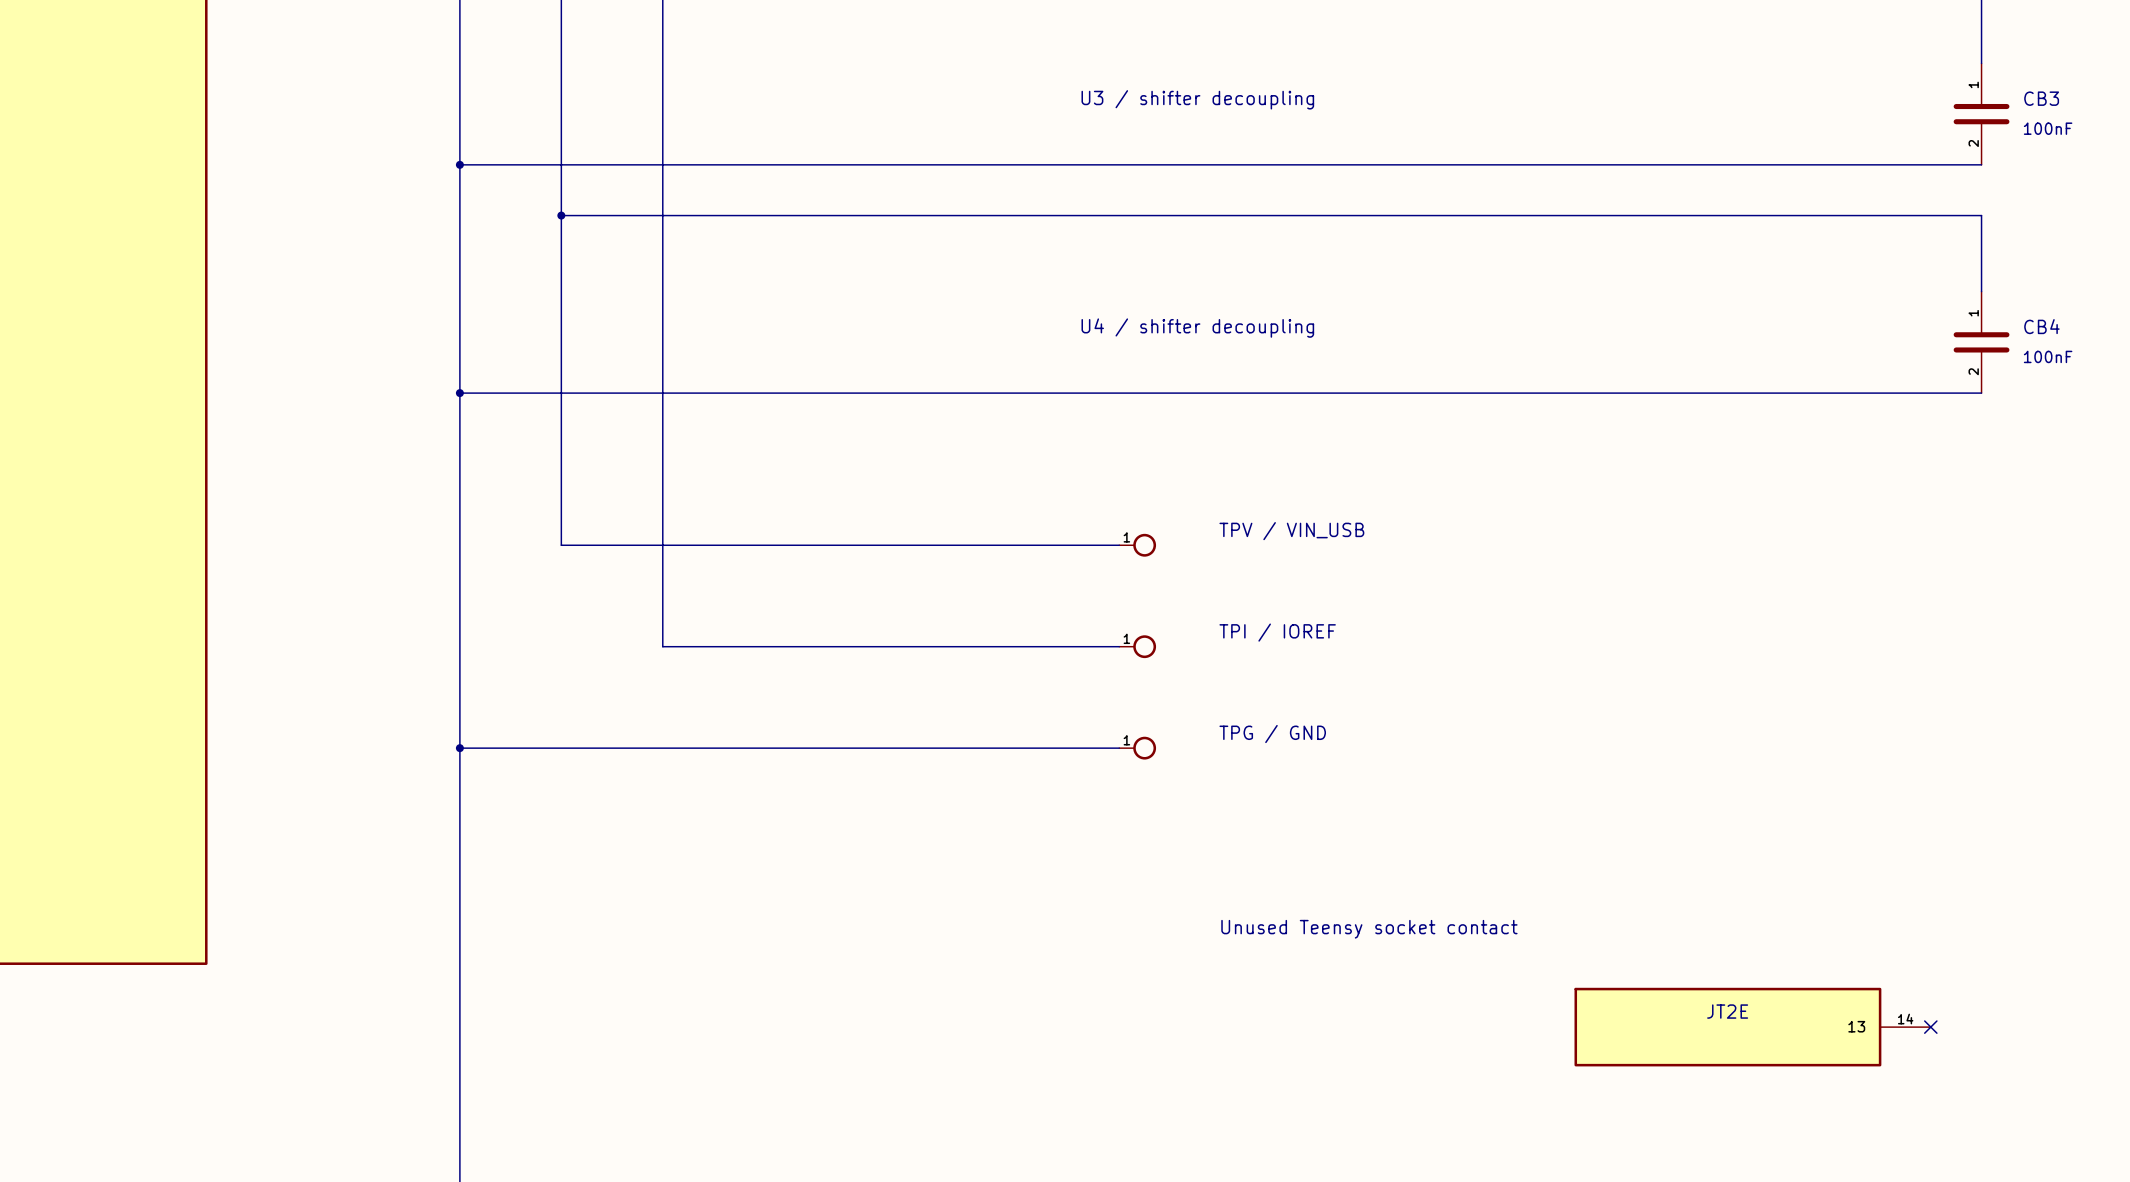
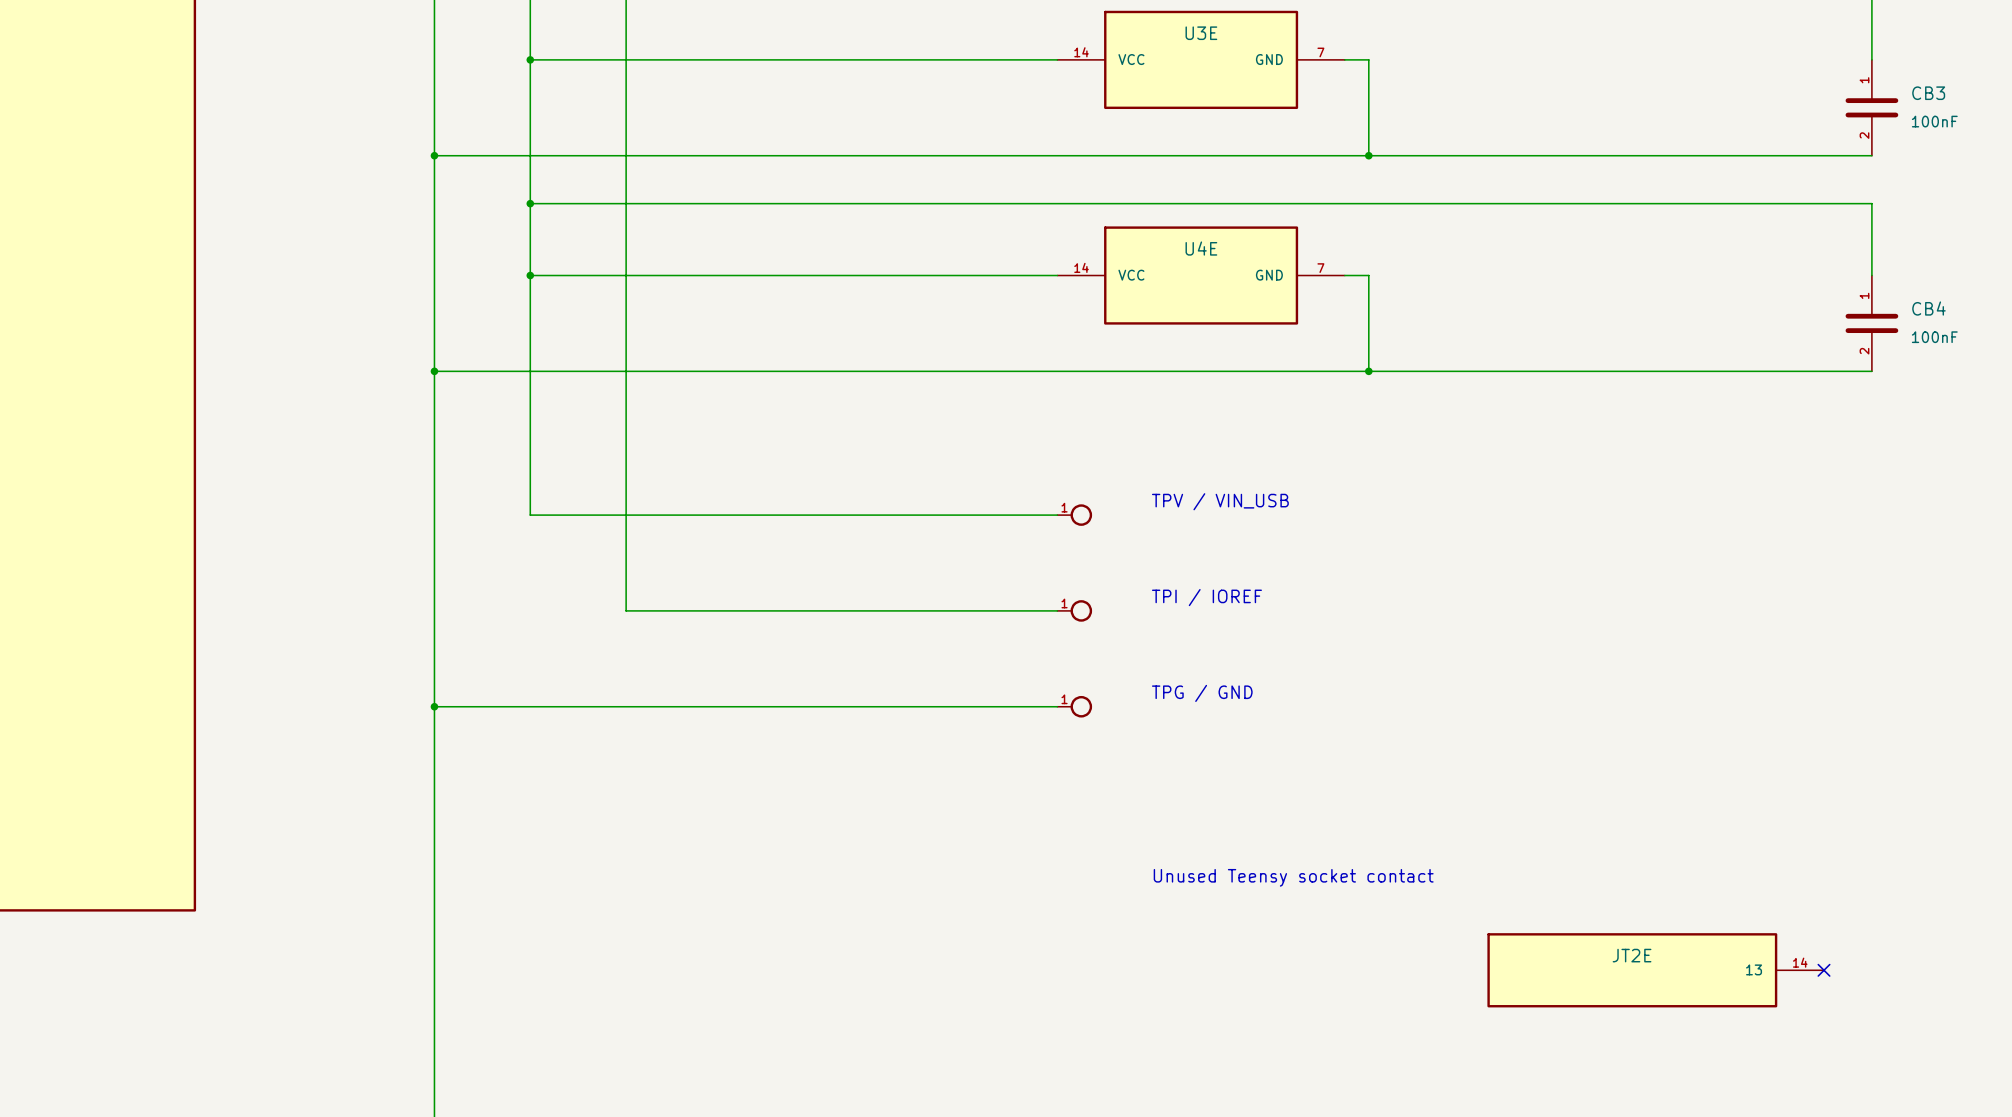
wire: none -> (530, 59) (1057, 59)
junction: none -> (530, 59)
U3E: none -> (1201, 59)
wire: none -> (1344, 59) (1368, 59) (1368, 155)
text: U3 / shifter decoupling (1197, 99) -> none
junction: none -> (1368, 155)
wire: none -> (530, 275) (1057, 275)
junction: none -> (530, 275)
U4E: none -> (1201, 275)
wire: none -> (1344, 275) (1368, 275) (1368, 371)
text: U4 / shifter decoupling (1197, 328) -> none
junction: none -> (1368, 371)

